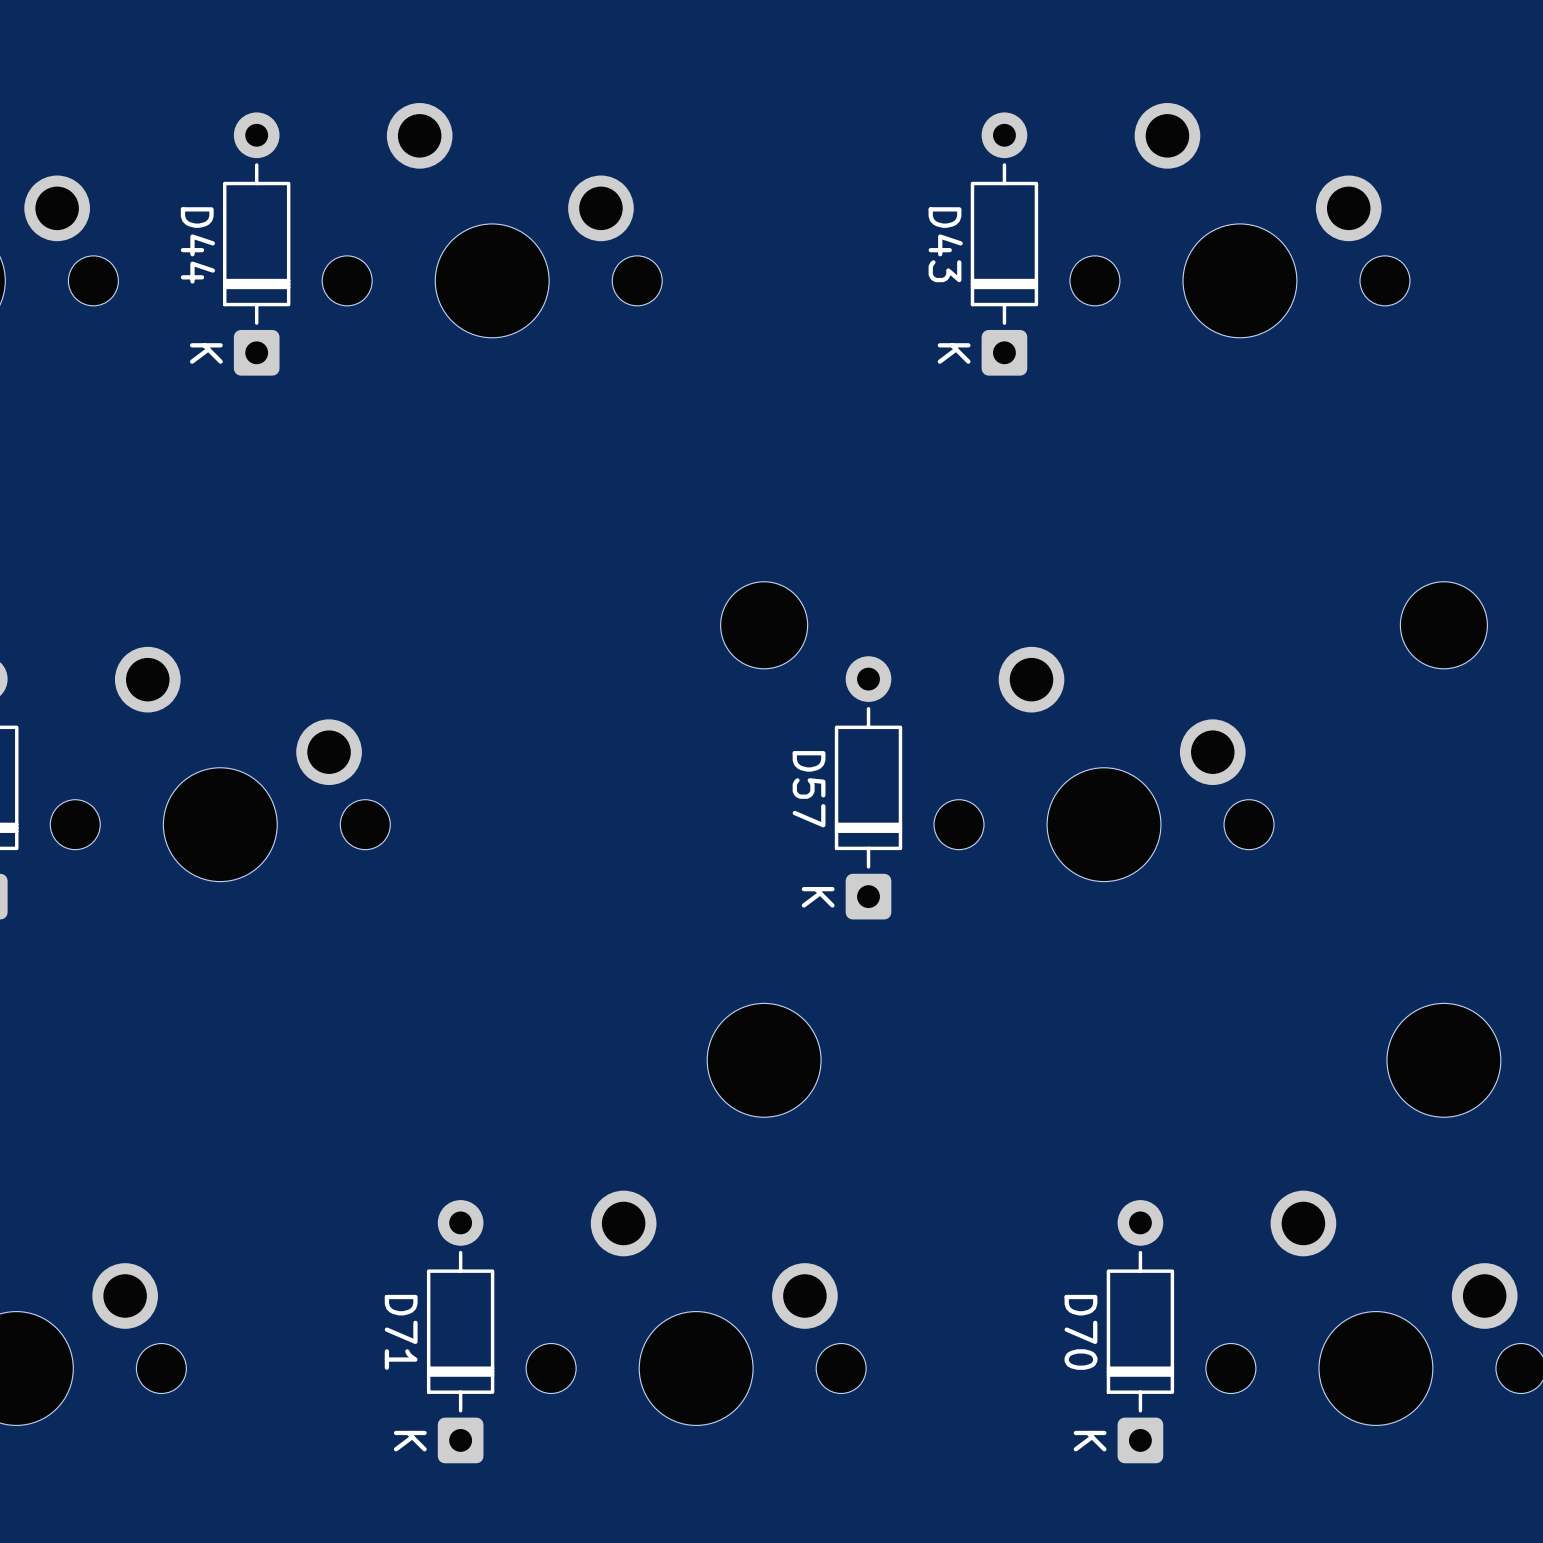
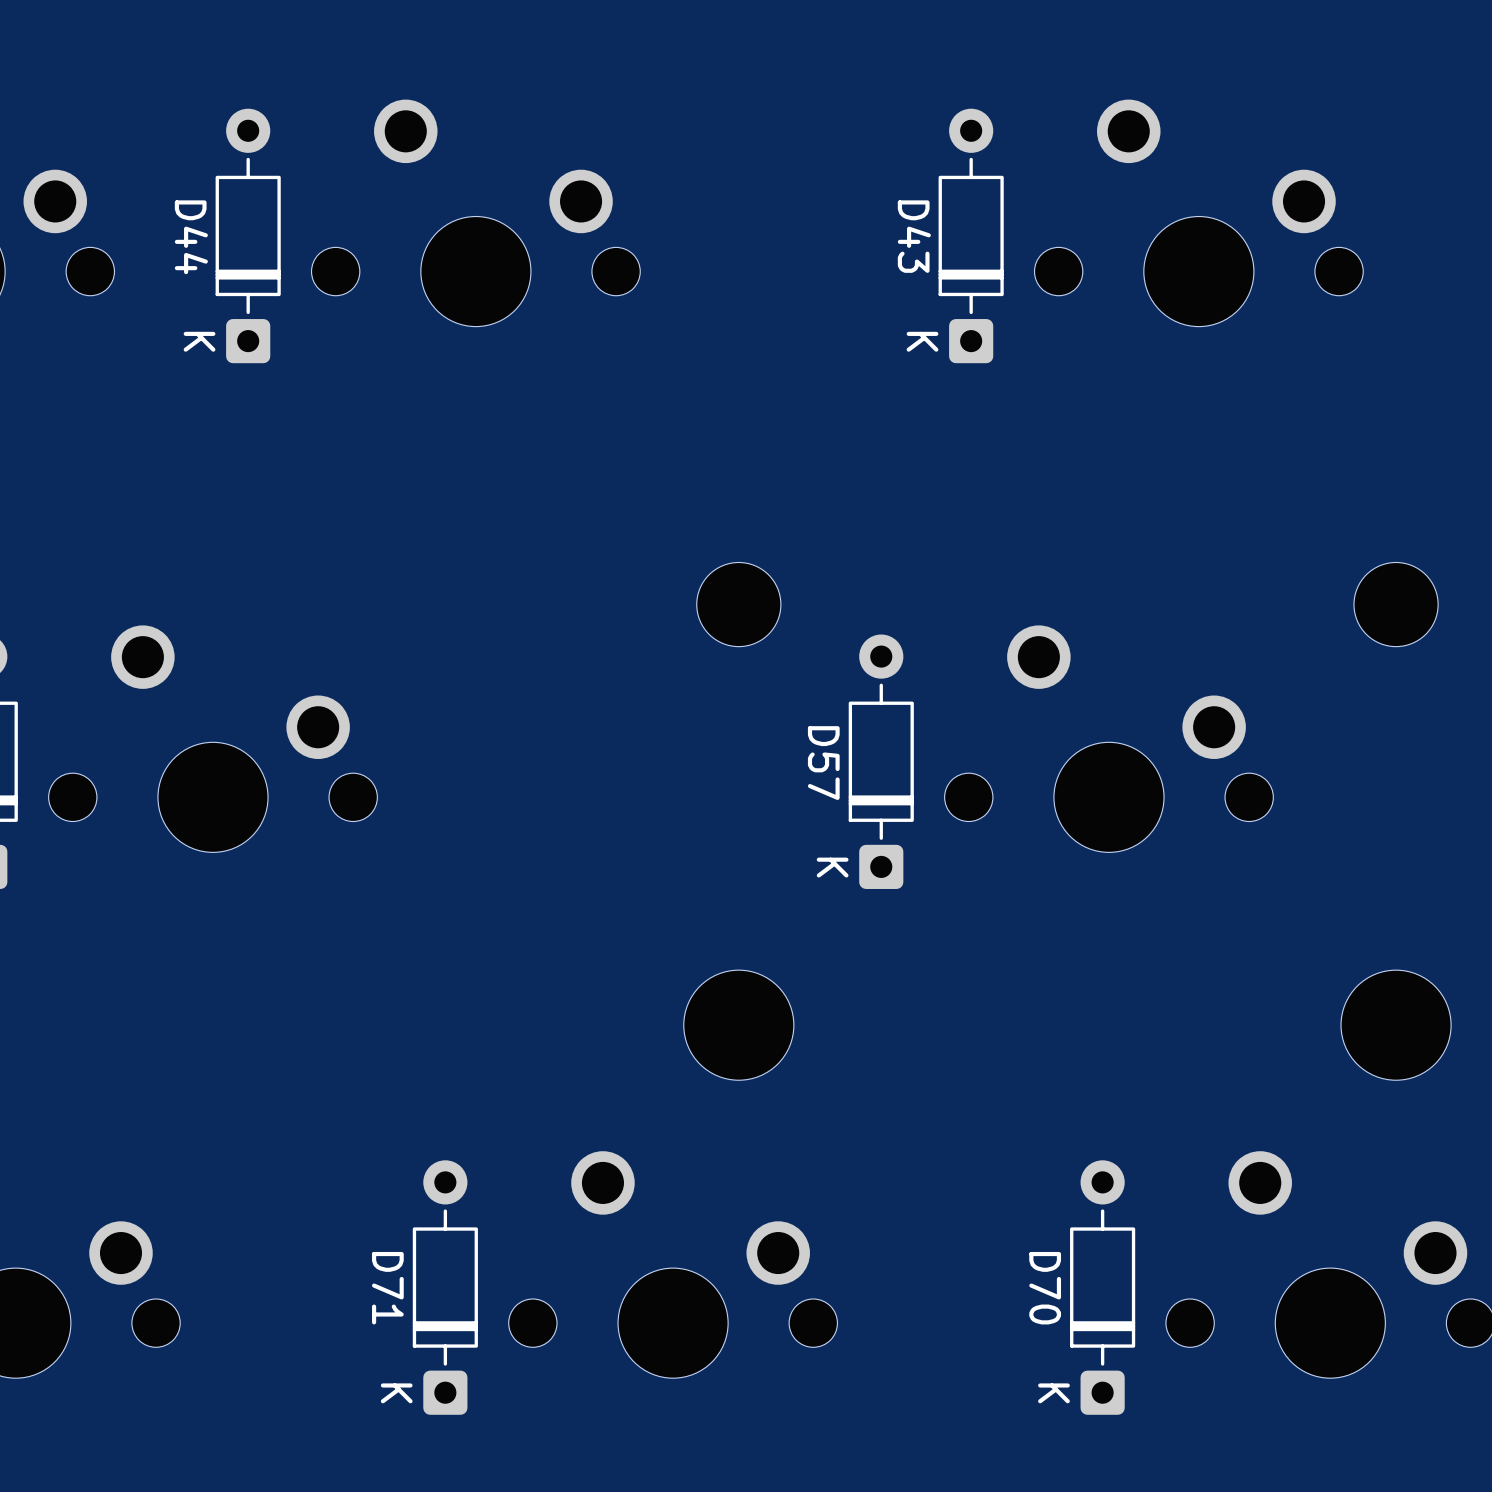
part position: (1104, 764) -> (1108, 738)
D57 position: (868, 787) -> (881, 761)

